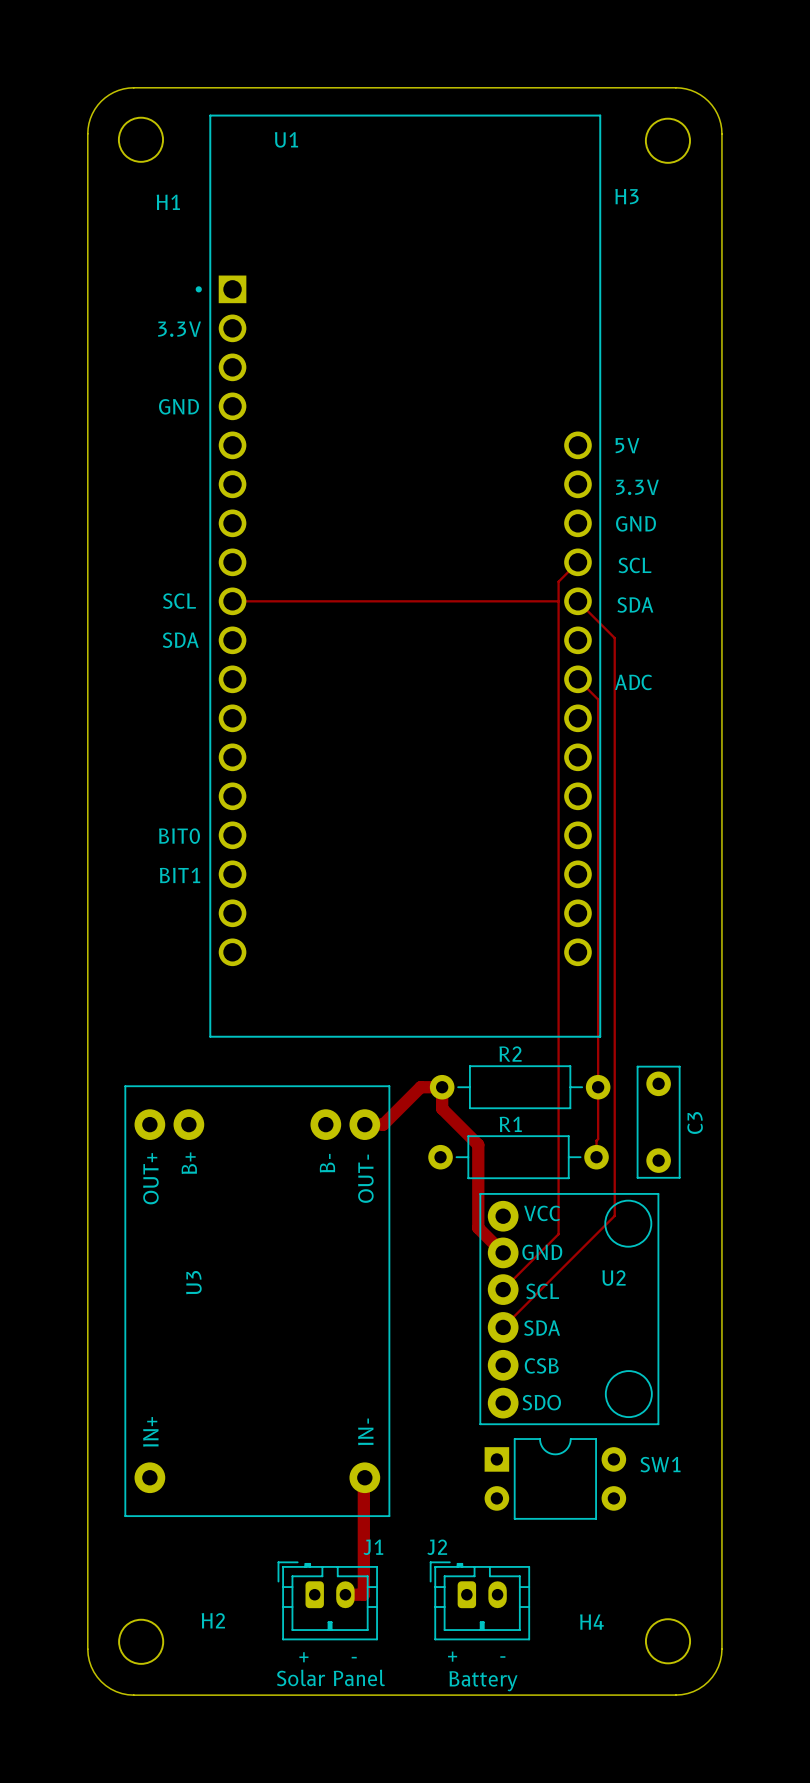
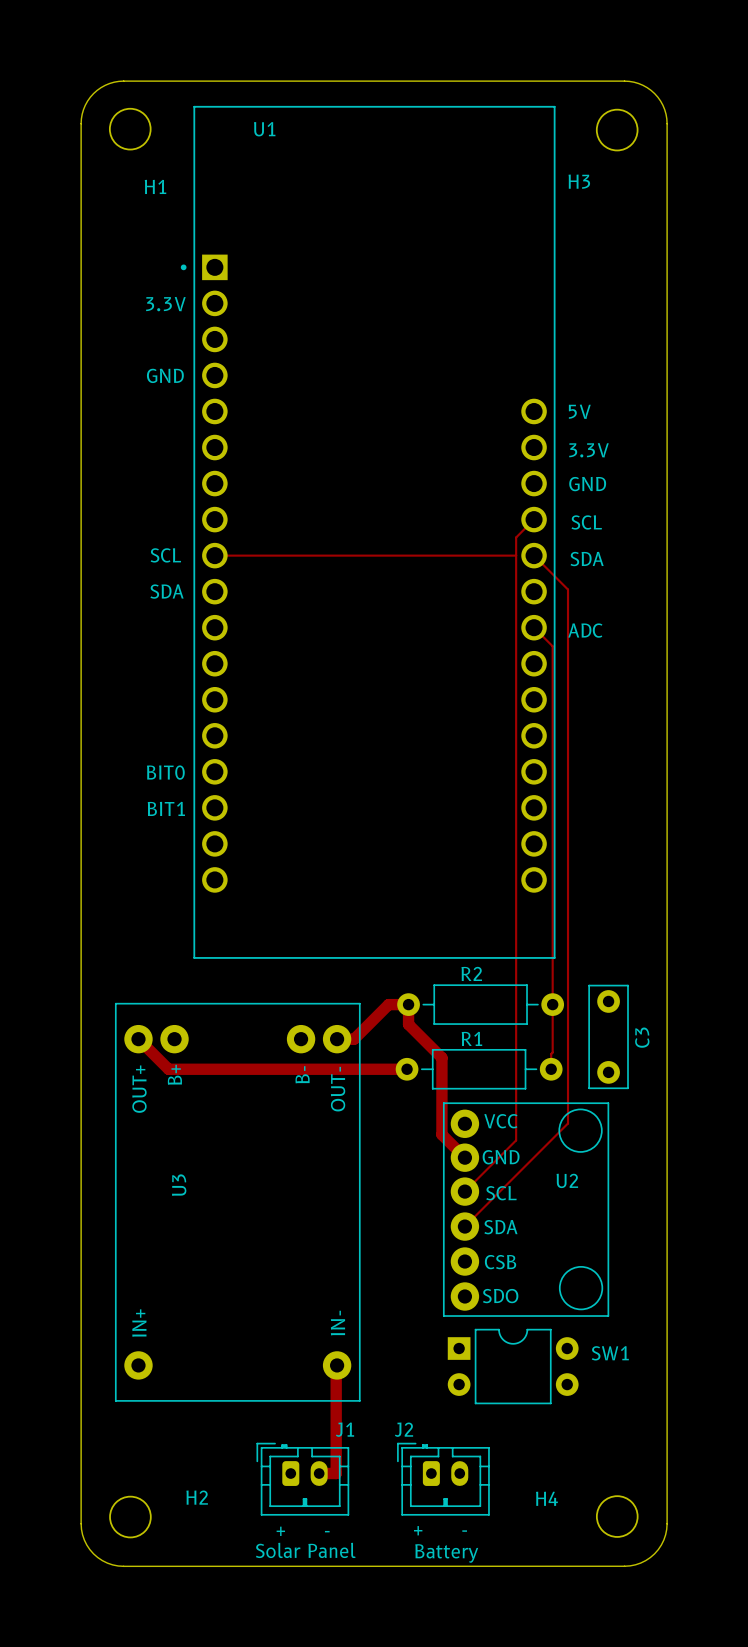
track: none -> (138, 1039) (168, 1069) (407, 1069)

